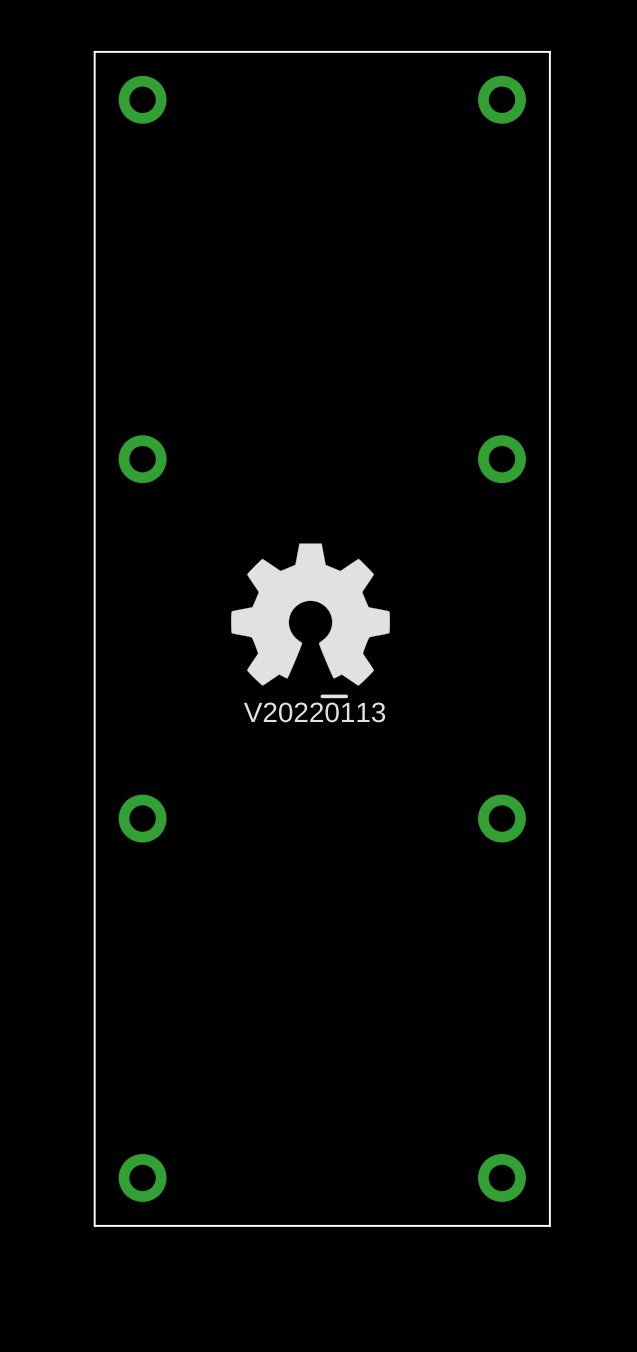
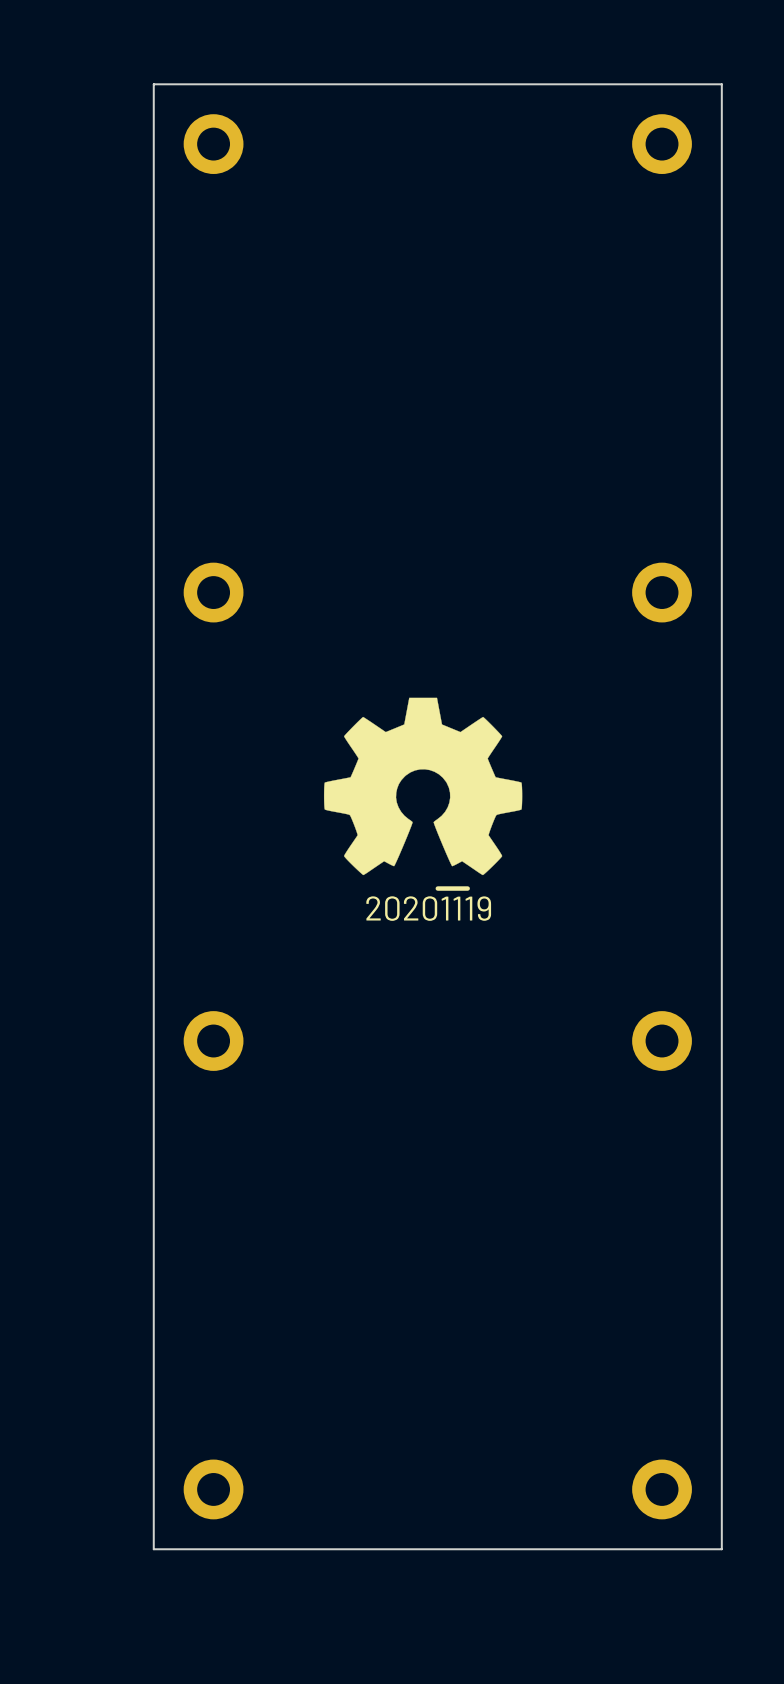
drawing shape: [243, 694, 386, 723] -> [366, 886, 492, 921]

